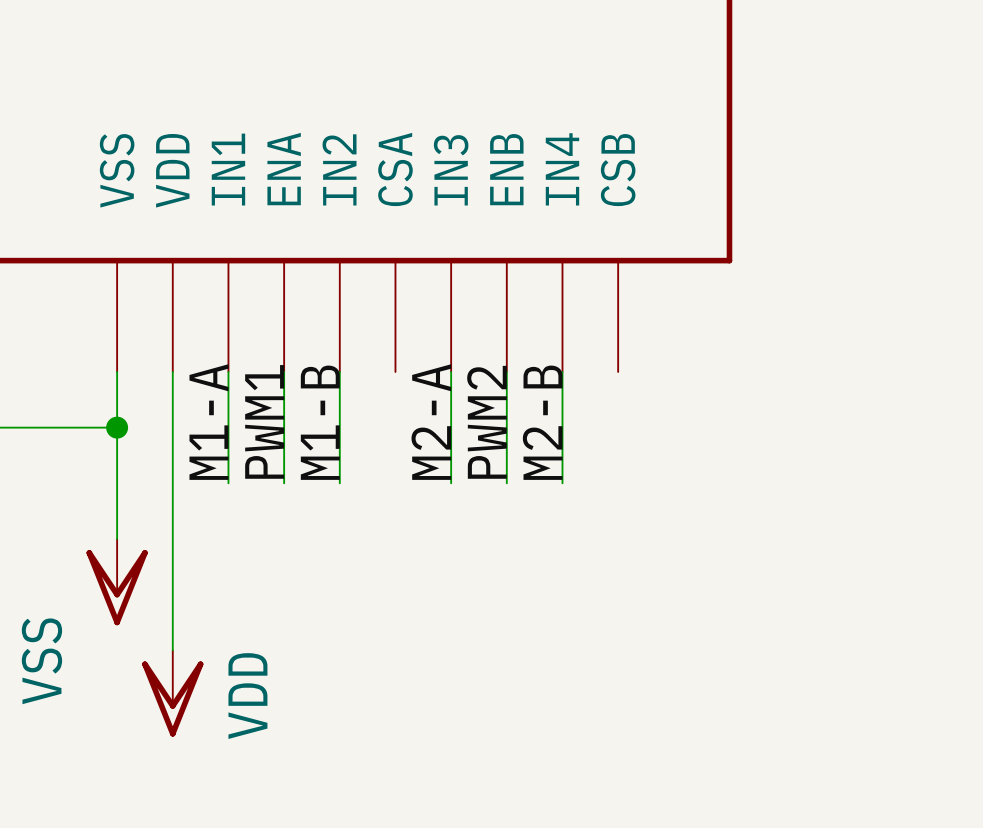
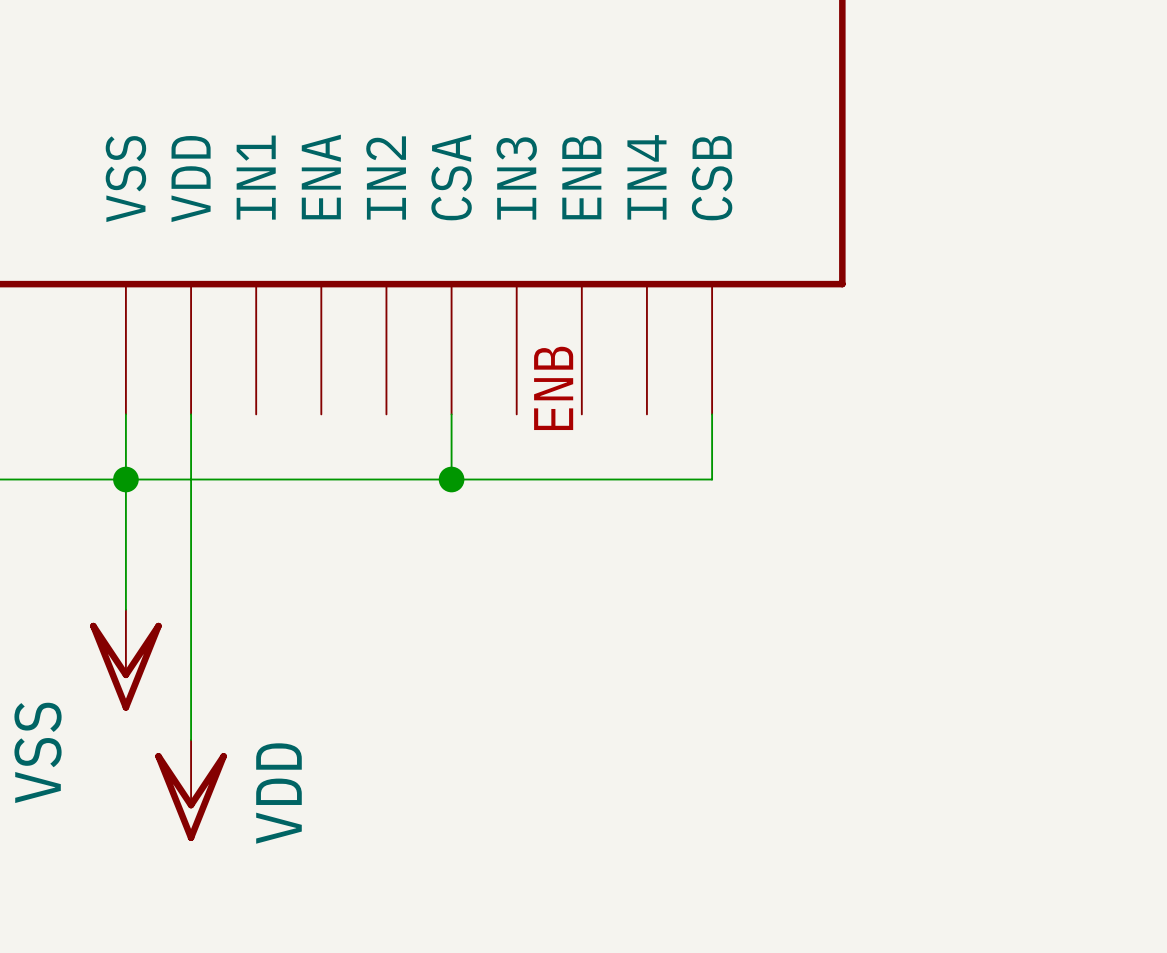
part pin number: none -> ENB (553, 388)
wire: (228, 371) (228, 483) -> none
wire: (284, 371) (284, 483) -> none
wire: (339, 371) (339, 483) -> none
wire: none -> (451, 414) (451, 479)
wire: (451, 371) (451, 483) -> none
wire: (506, 371) (506, 483) -> none
wire: (562, 371) (562, 483) -> none
wire: none -> (712, 414) (712, 479) (125, 479)
label: PWM1 (264, 421) -> none
label: M1-A (208, 422) -> none
label: M1-B (320, 422) -> none
label: M2-A (431, 422) -> none
label: PWM2 (486, 422) -> none
label: M2-B (542, 422) -> none
junction: none -> (451, 479)

